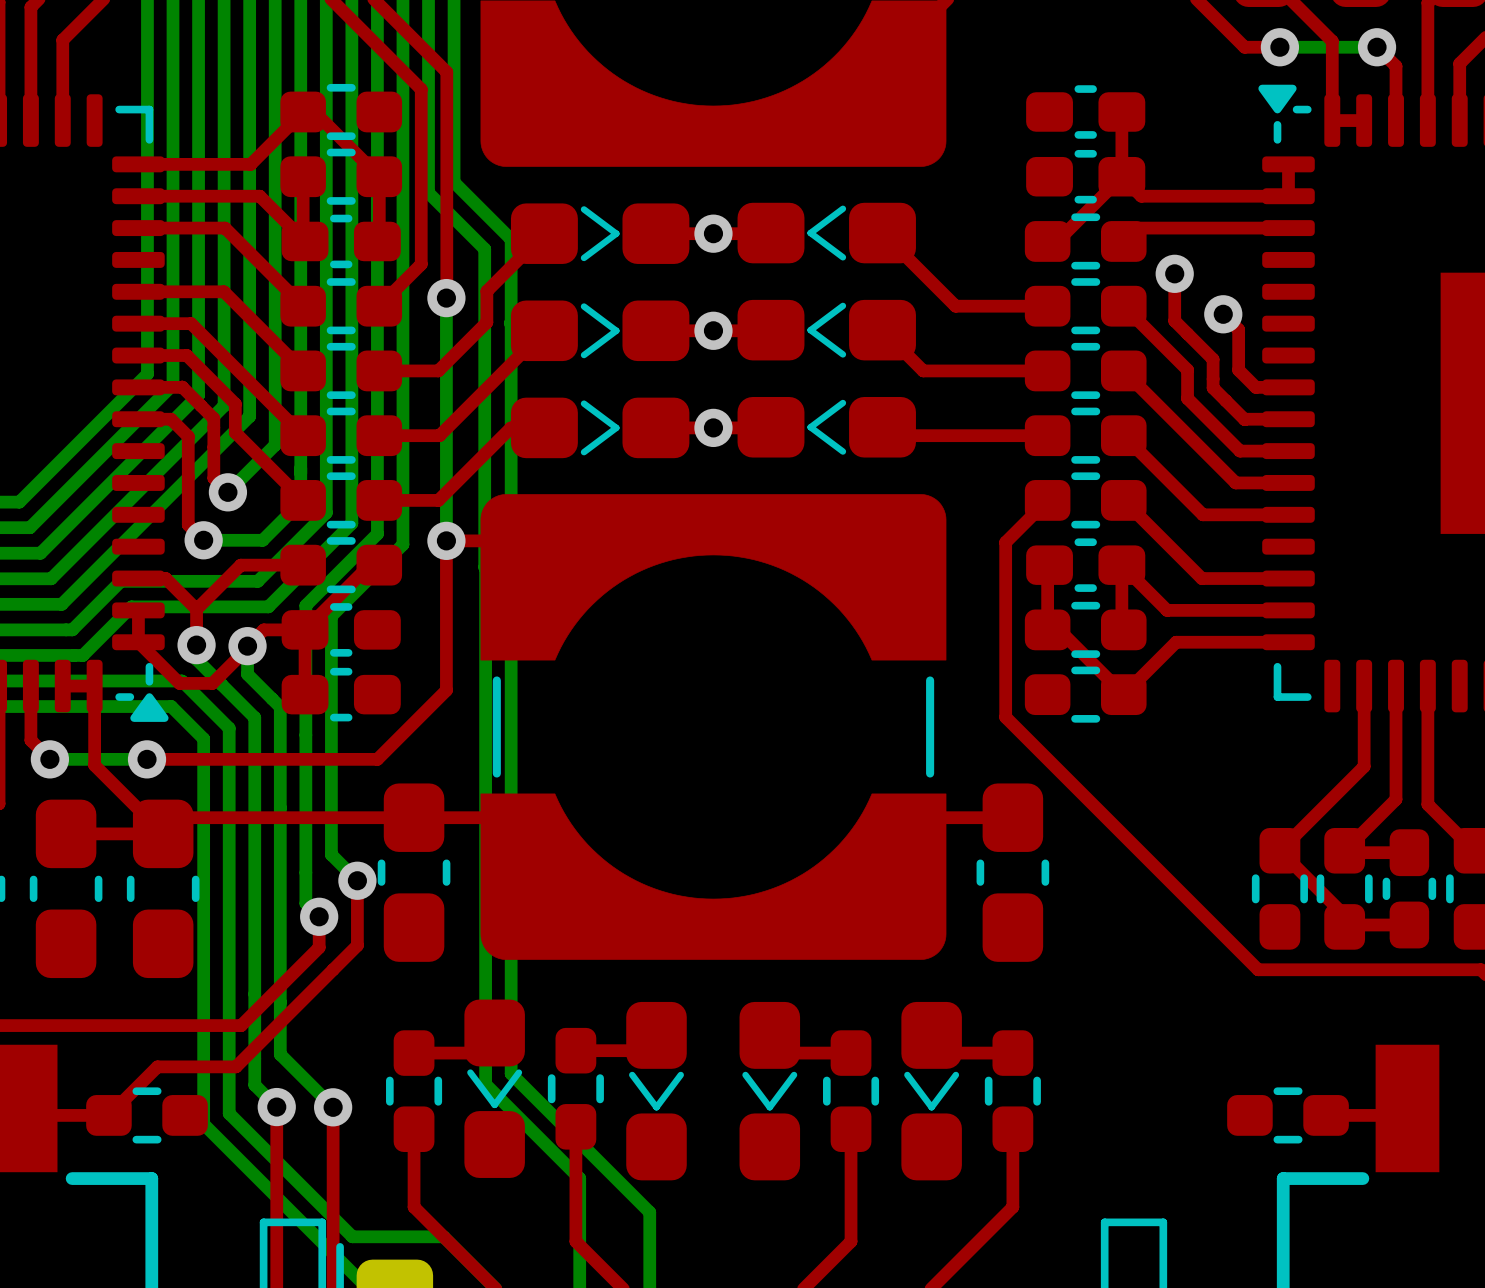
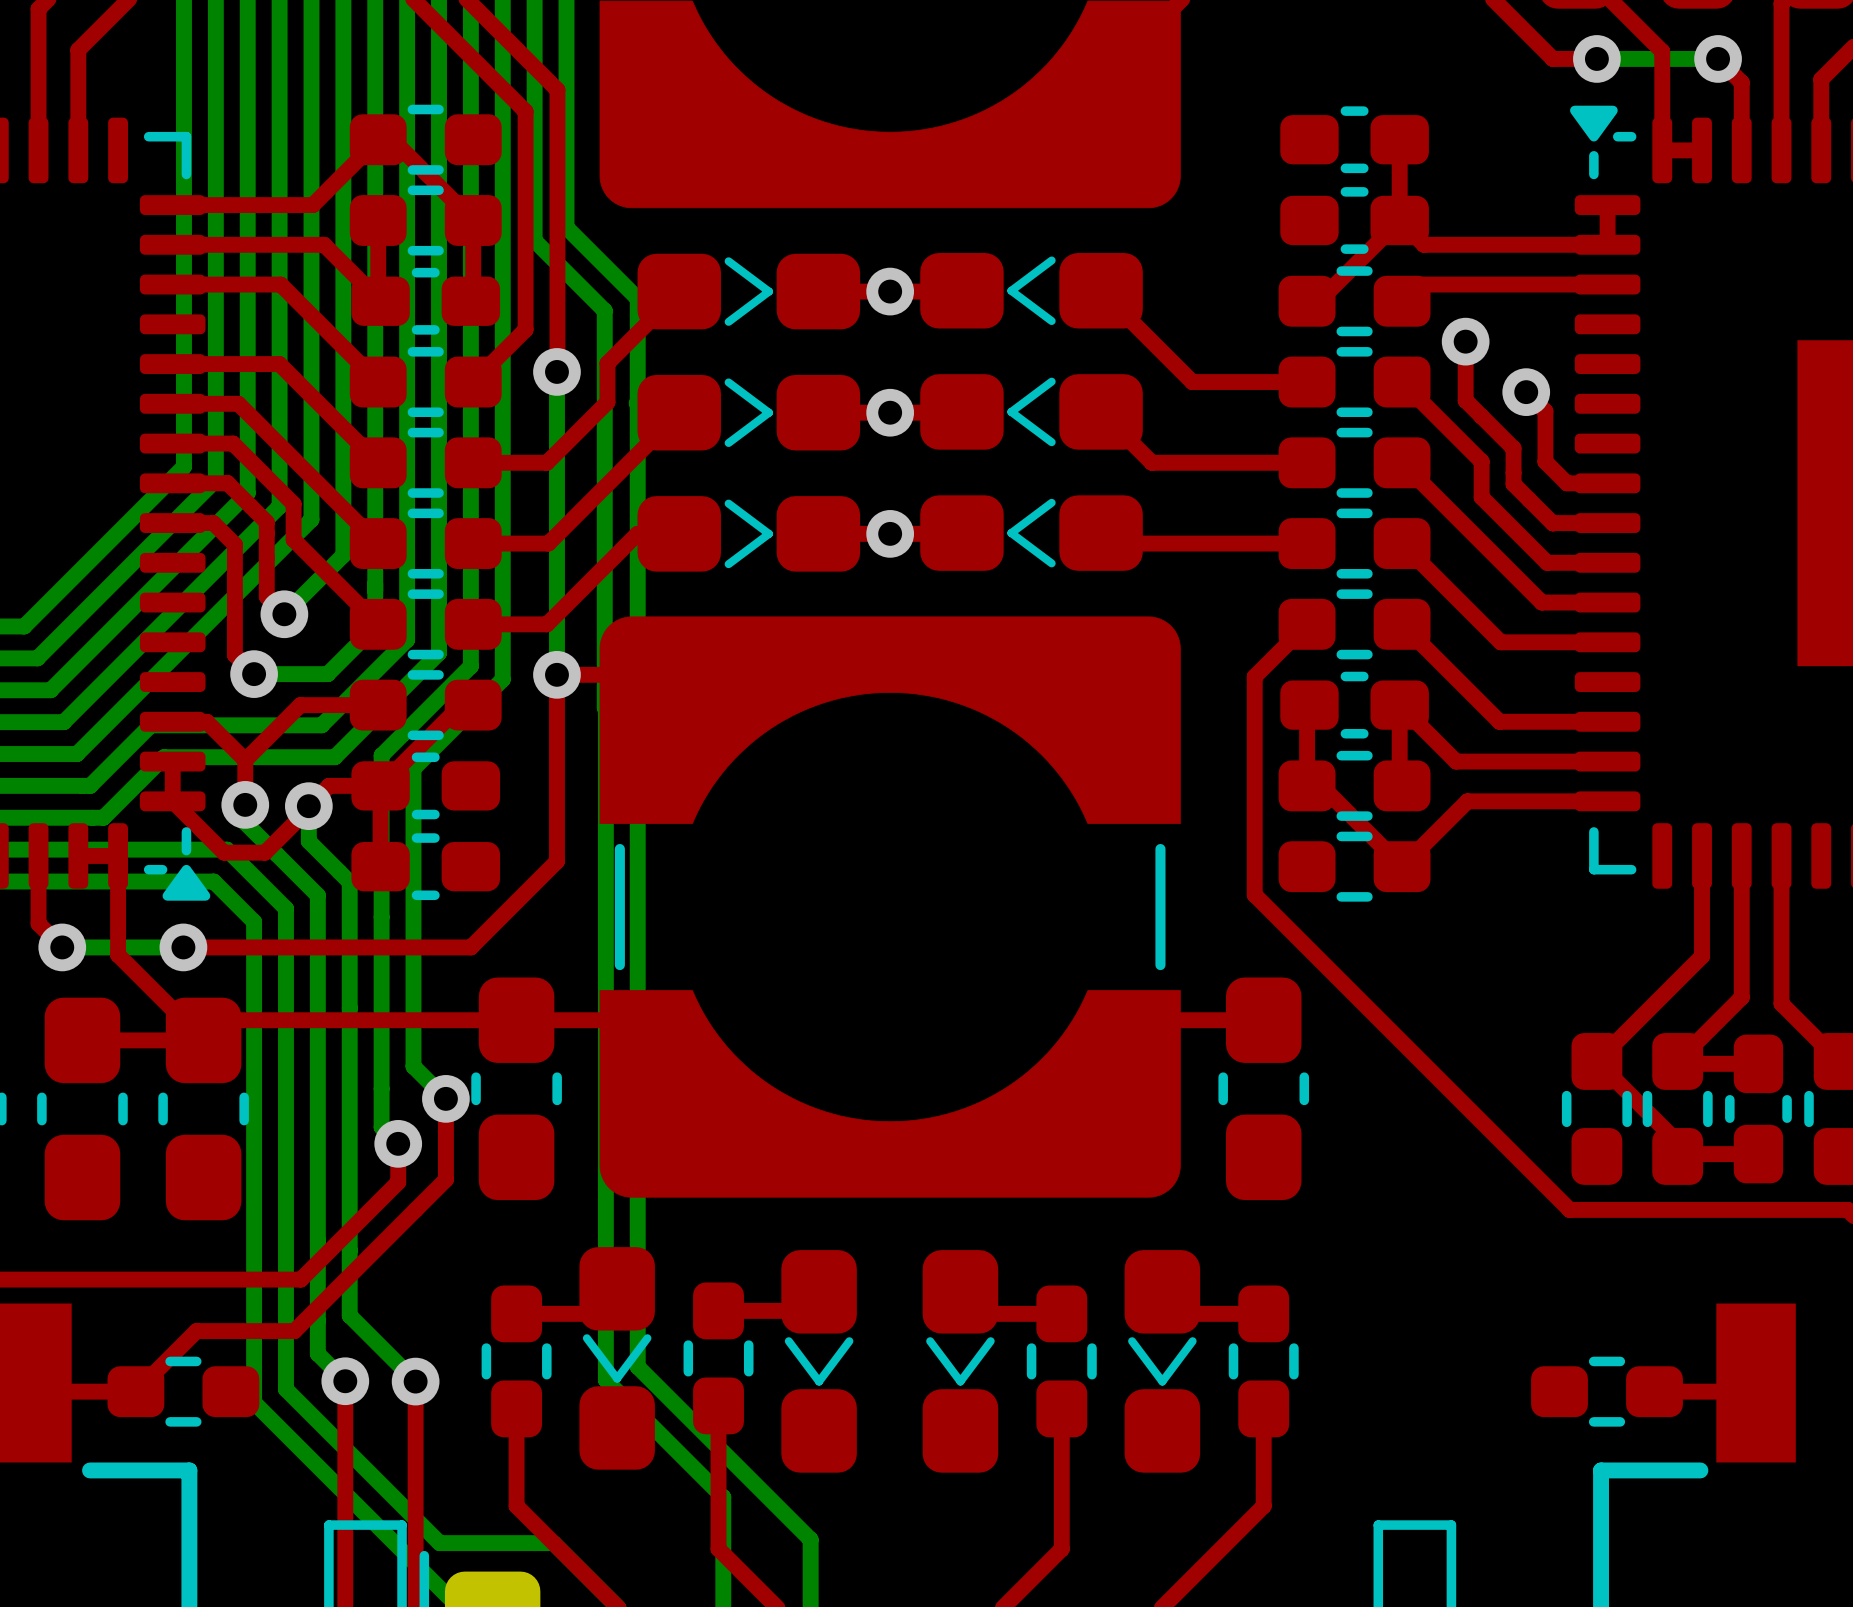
bottom track: (511, 1073) (649, 1212) (649, 1234) -> (637, 1339) (637, 1366) (810, 1539)
bottom track: (485, 1084) (579, 1178) (579, 1200) -> (605, 1352) (605, 1379) (723, 1497)

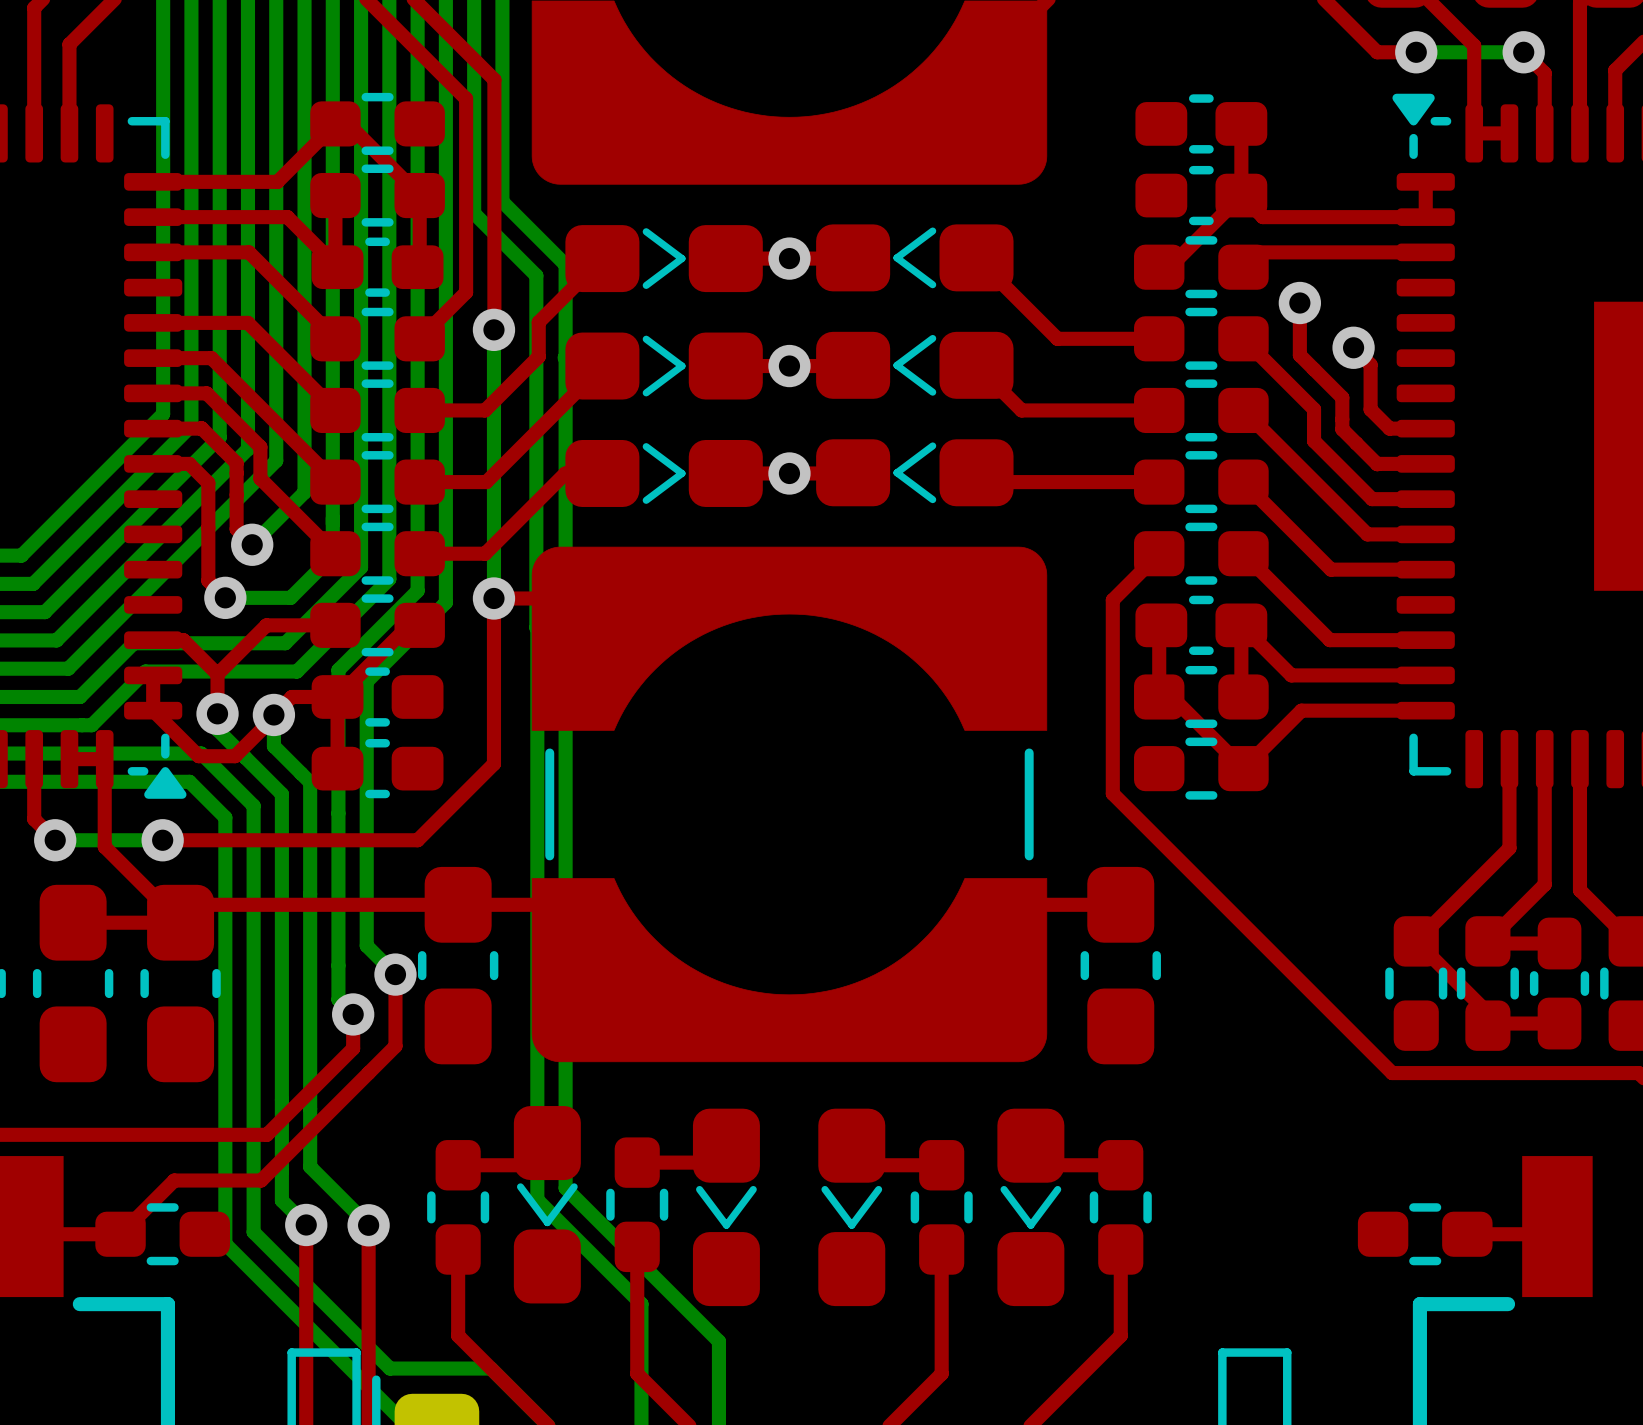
bottom track: (637, 1339) (637, 1366) (810, 1539) -> (565, 1188) (718, 1341) (718, 1365)
bottom track: (605, 1352) (605, 1379) (723, 1497) -> (537, 1199) (641, 1303) (641, 1328)

